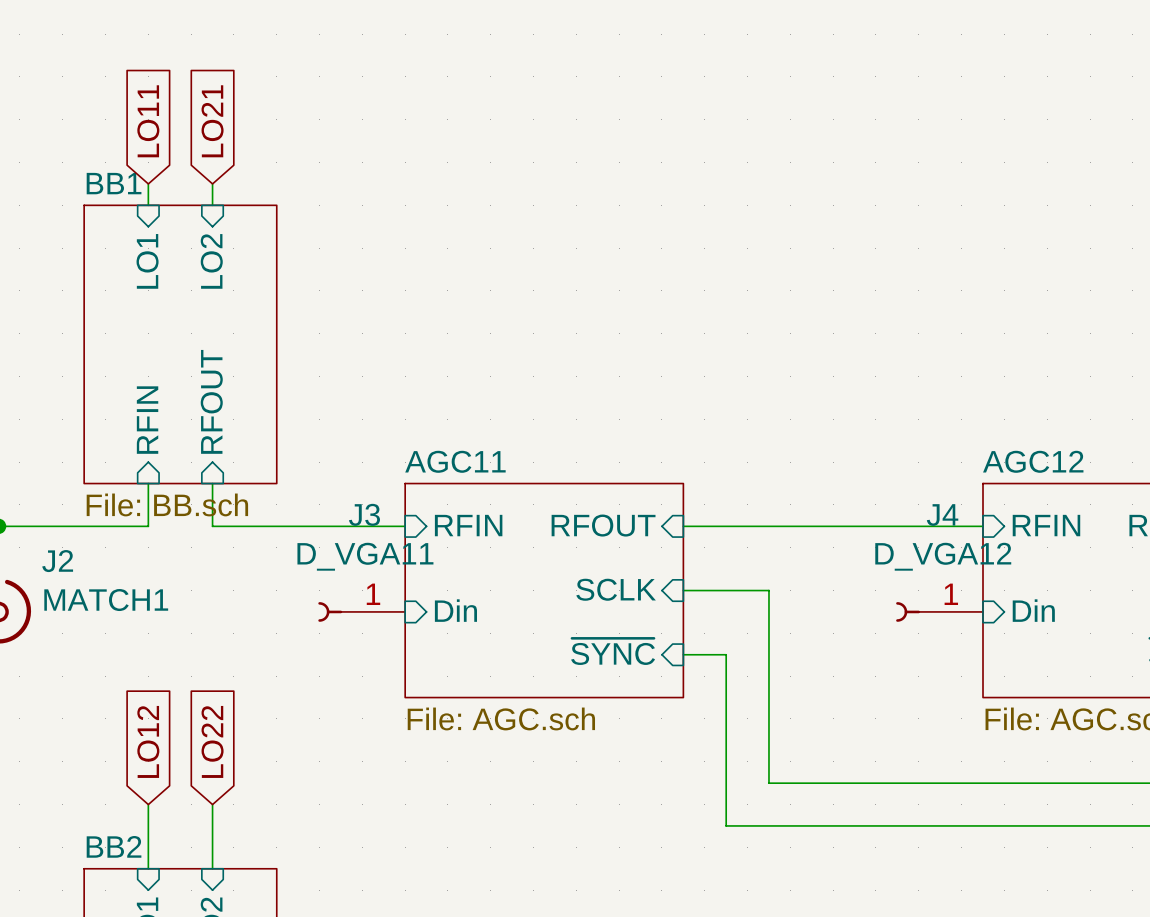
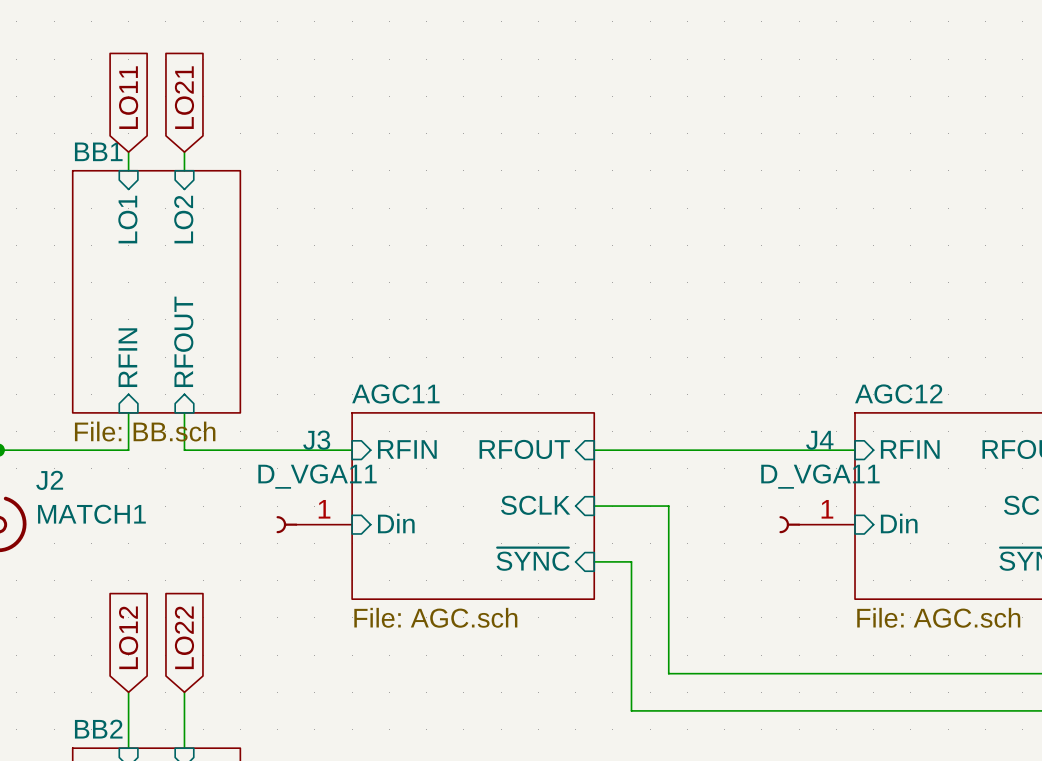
J4 value: D_VGA12 (943, 556) -> D_VGA11 (820, 476)

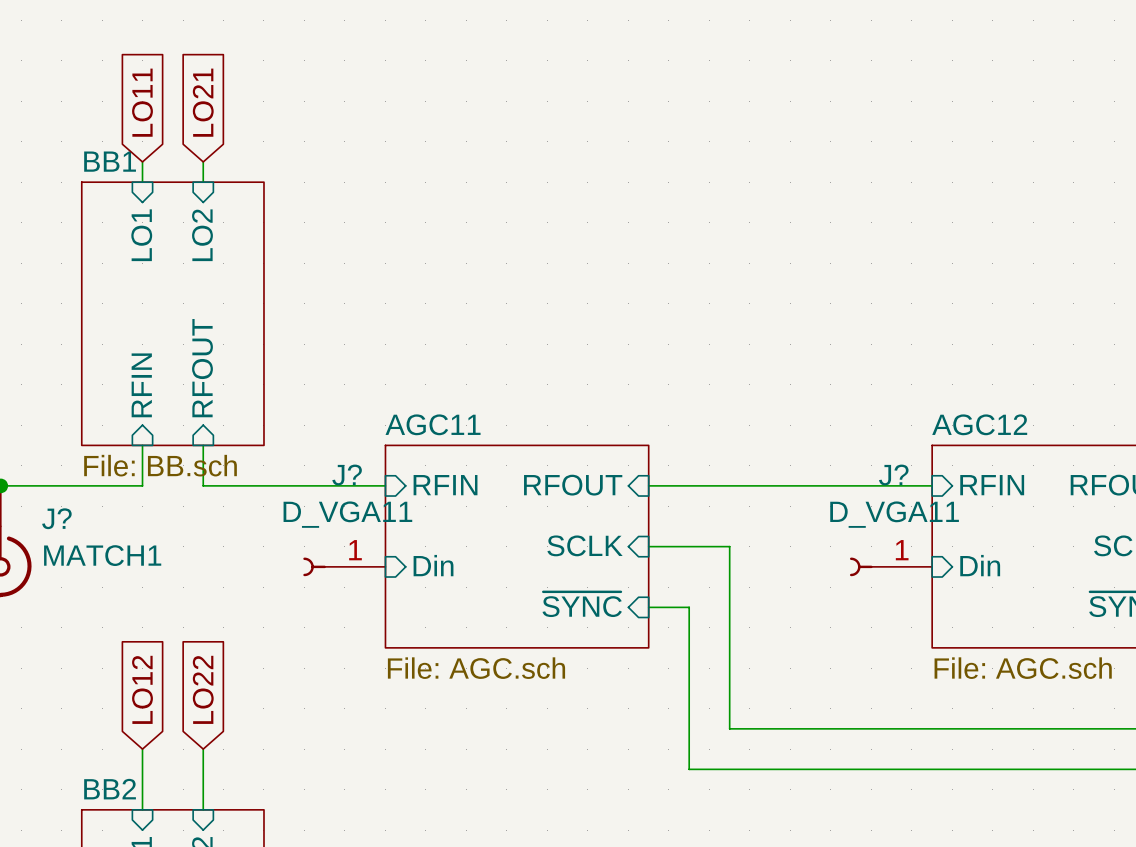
J3 name: J3 (316, 440) -> J? (347, 475)
J4 name: J4 (819, 440) -> J? (893, 475)
J2 name: J2 (49, 480) -> J? (56, 518)

